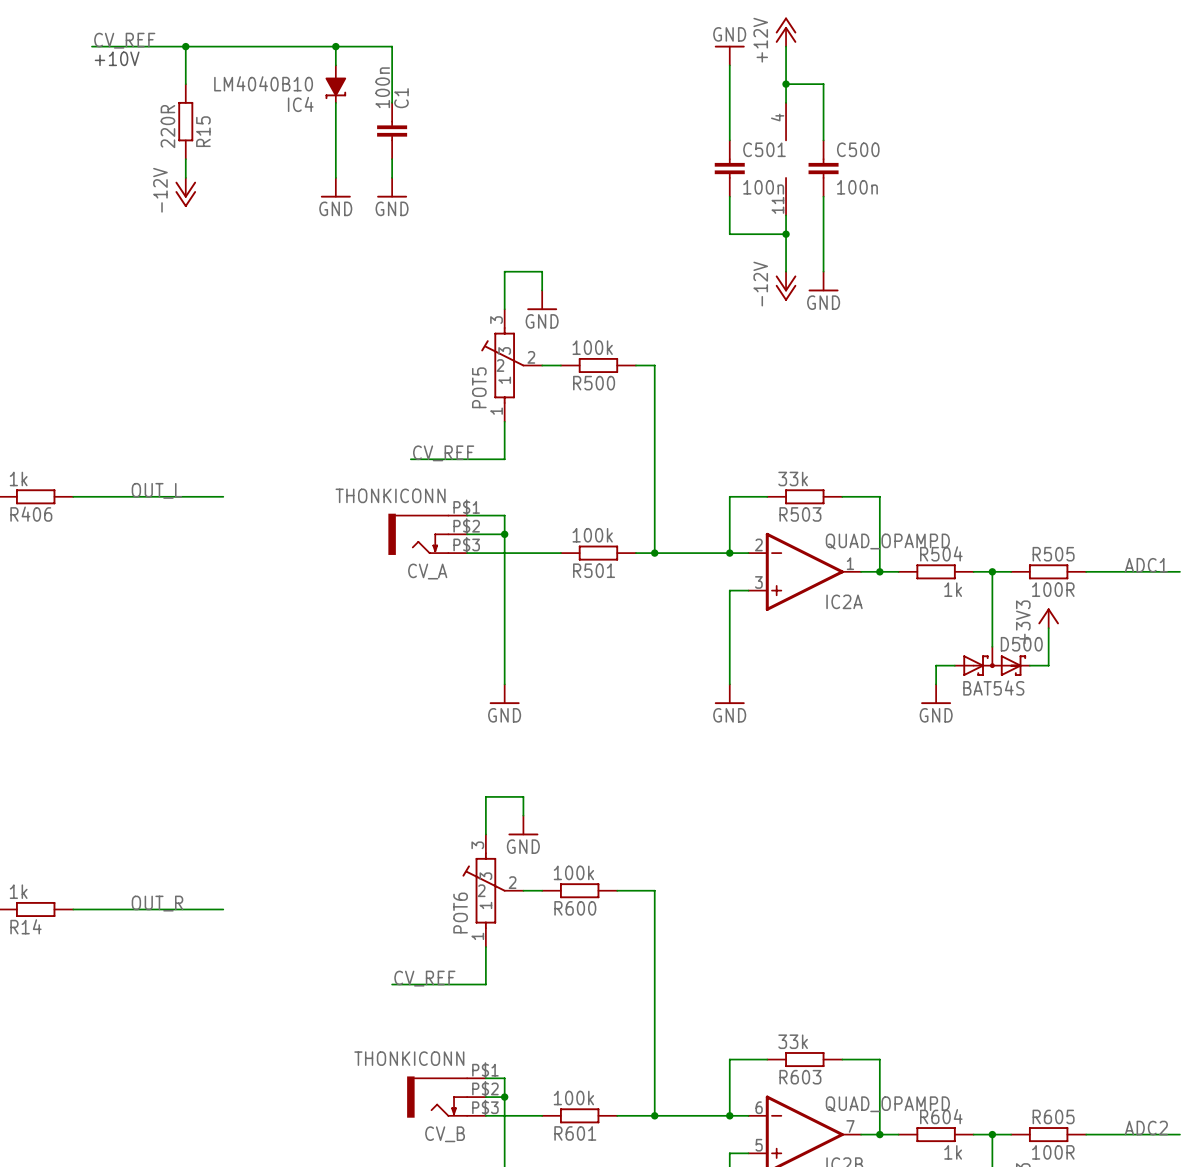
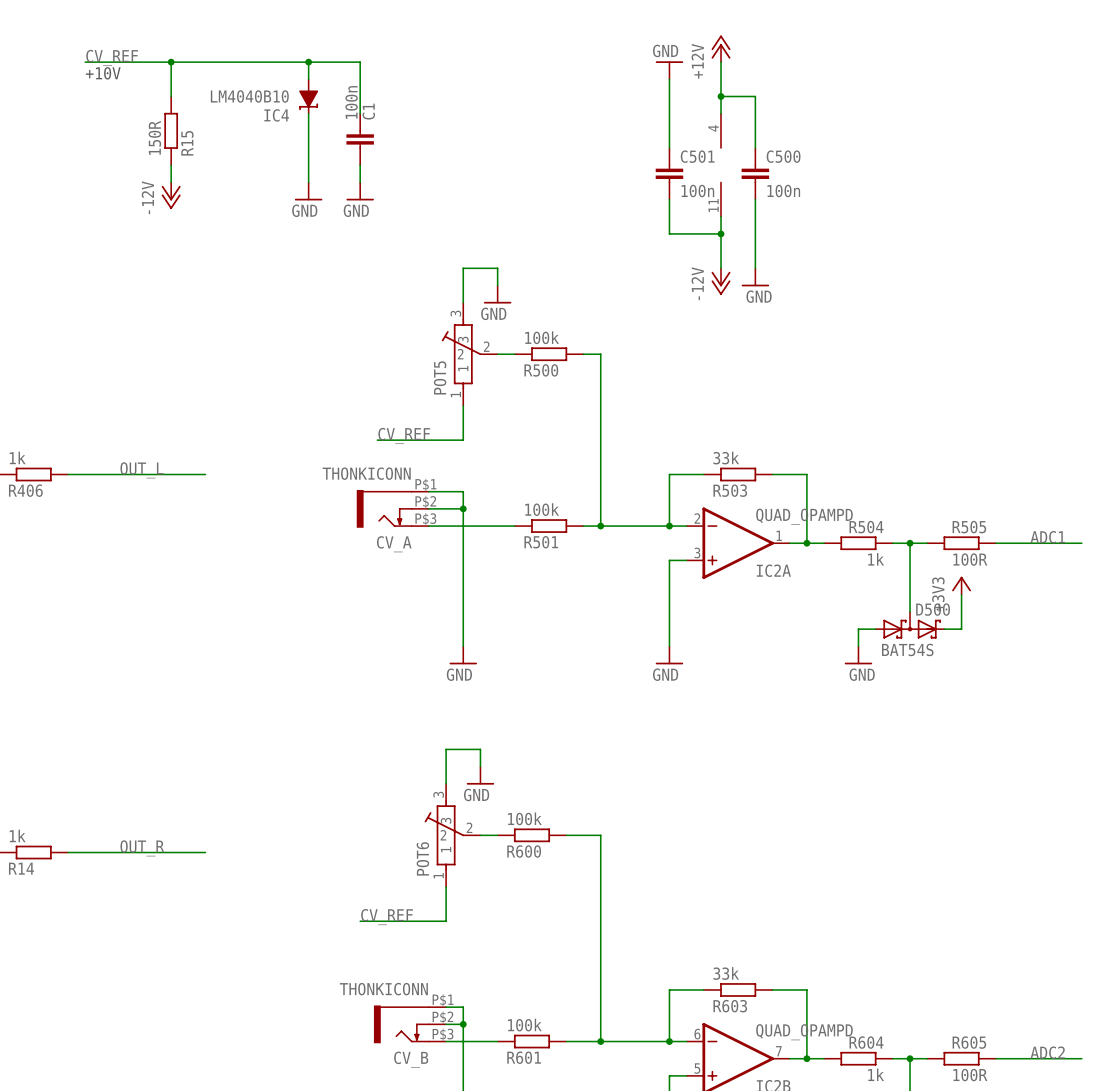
R15 value: 220R (167, 126) -> 150R (154, 137)

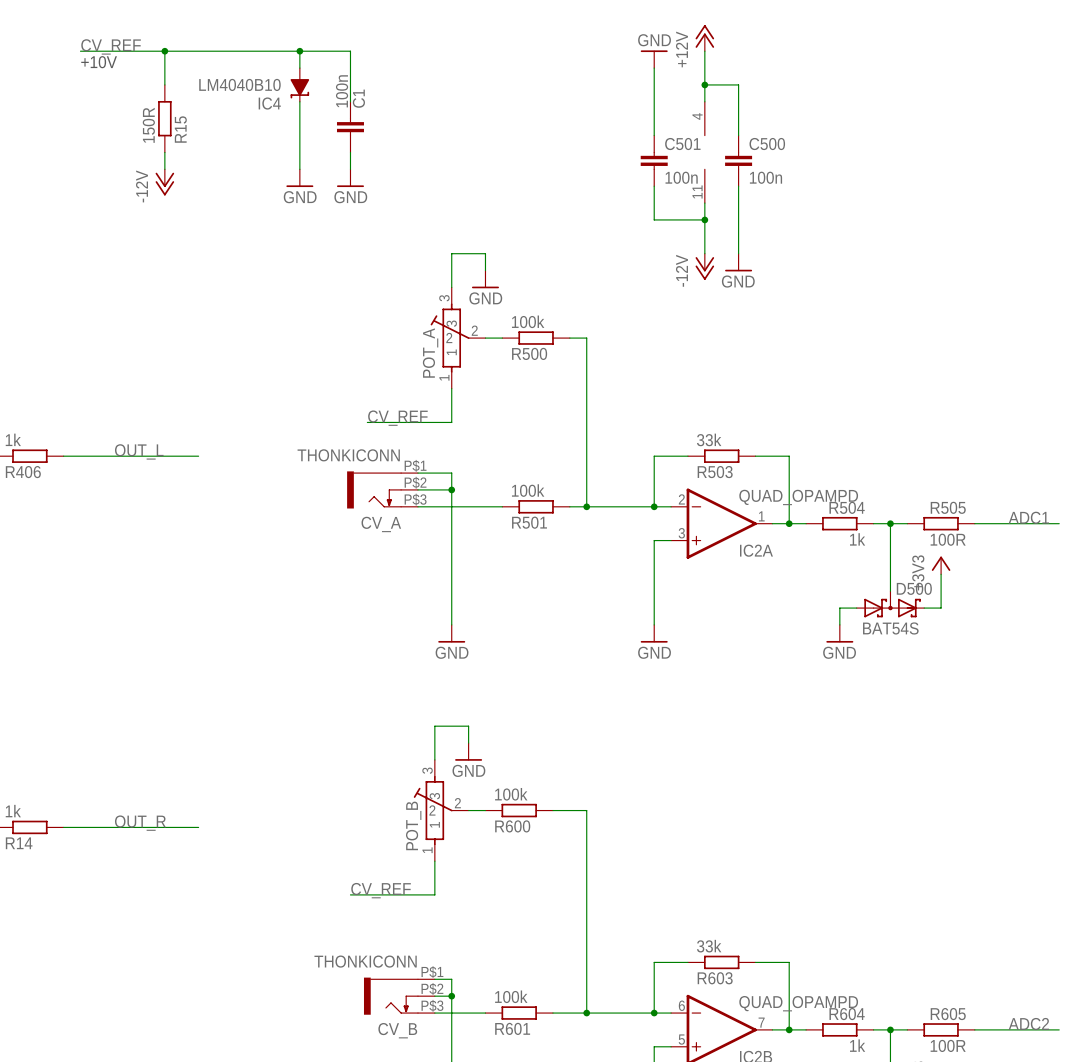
POT5 name: POT5 (440, 377) -> POT_A (430, 353)
POT6 name: POT6 (422, 858) -> POT_B (413, 825)

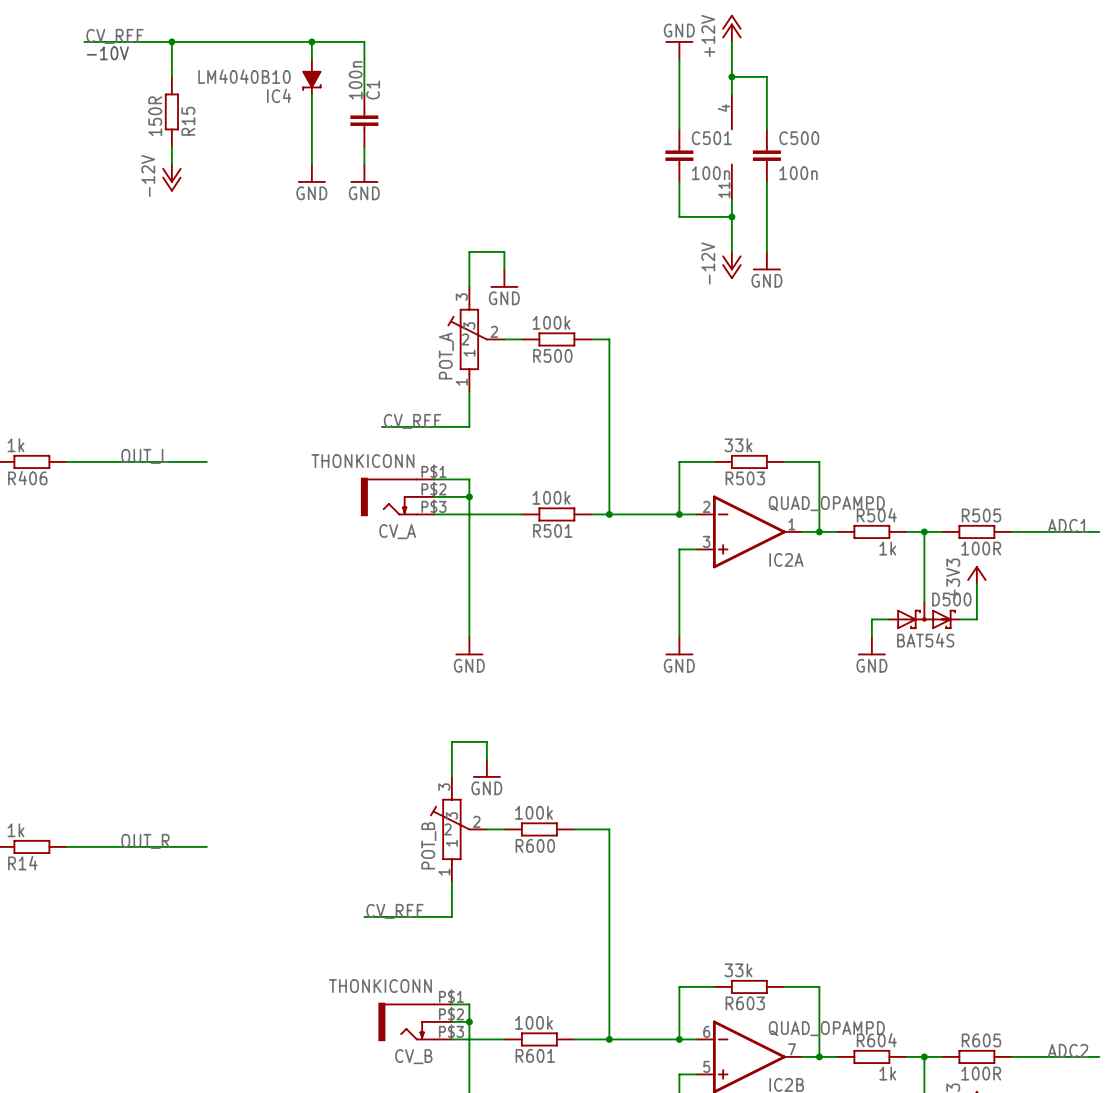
text: +10V (99, 62) -> -10V (107, 53)

